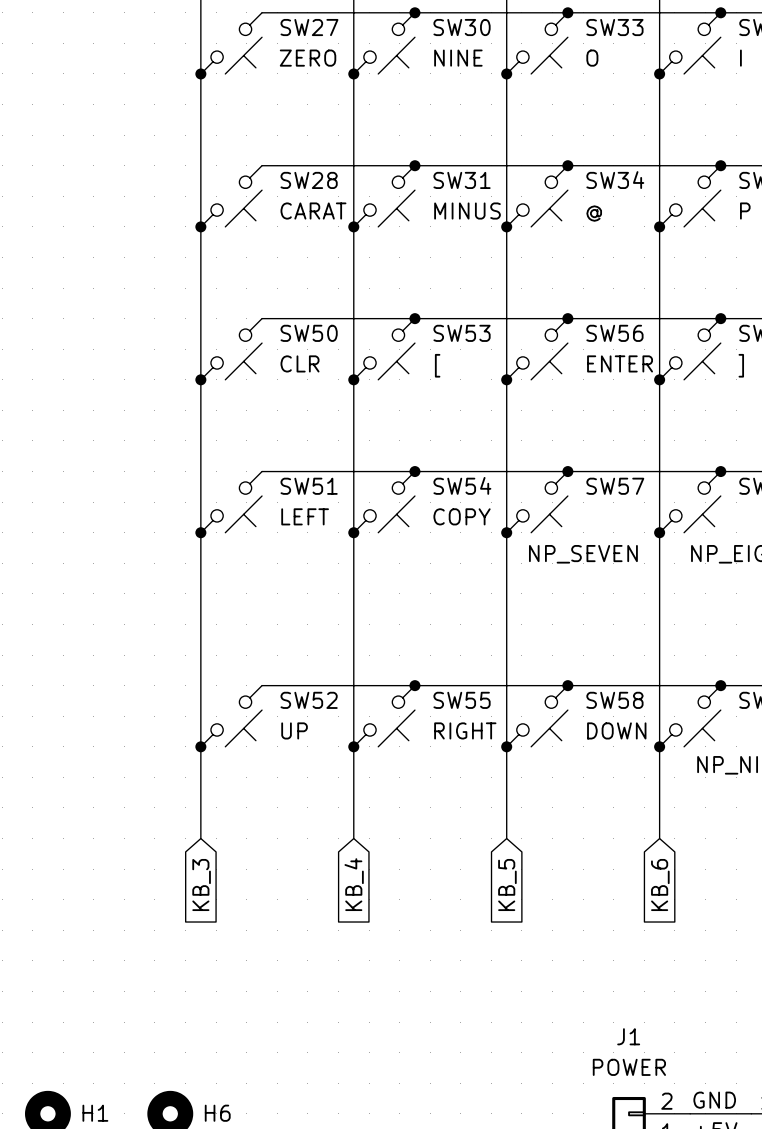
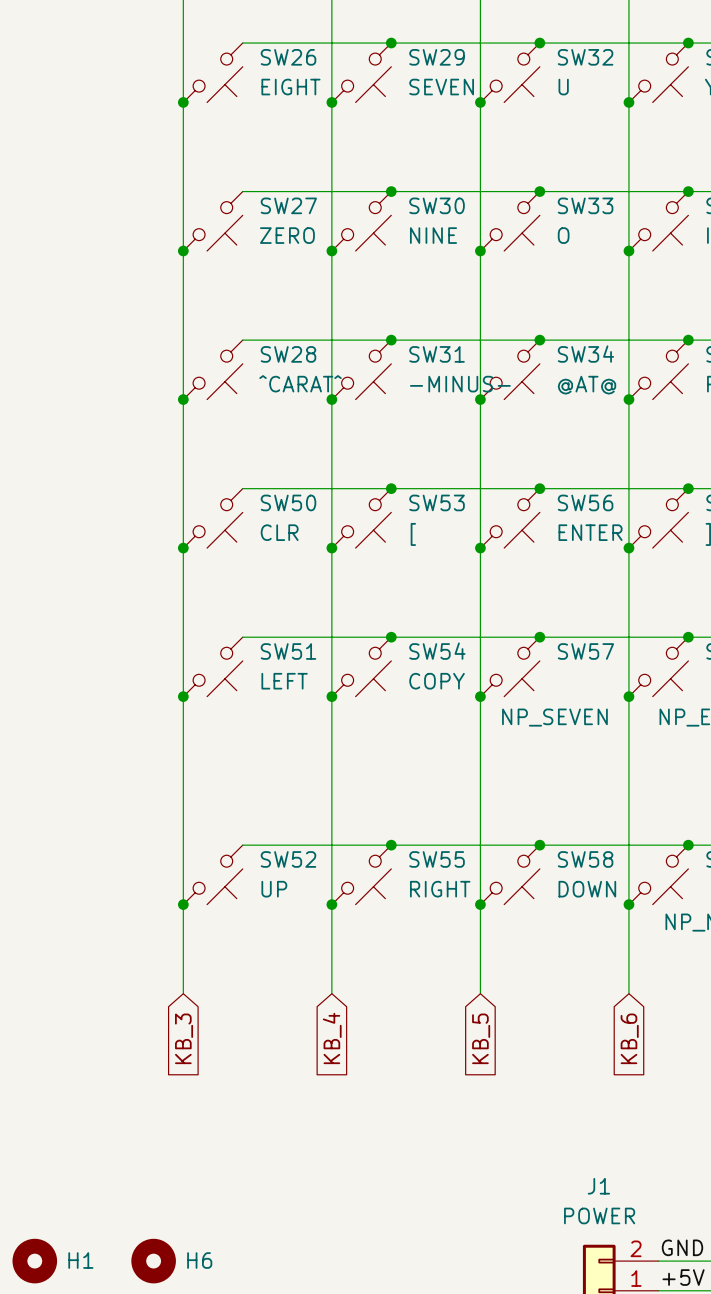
SW28 value: CARAT (313, 211) -> ^CARAT^ (300, 383)
SW31 value: MINUS (467, 211) -> -MINUS- (460, 384)
SW34 value: @ (594, 213) -> @AT@ (586, 385)

